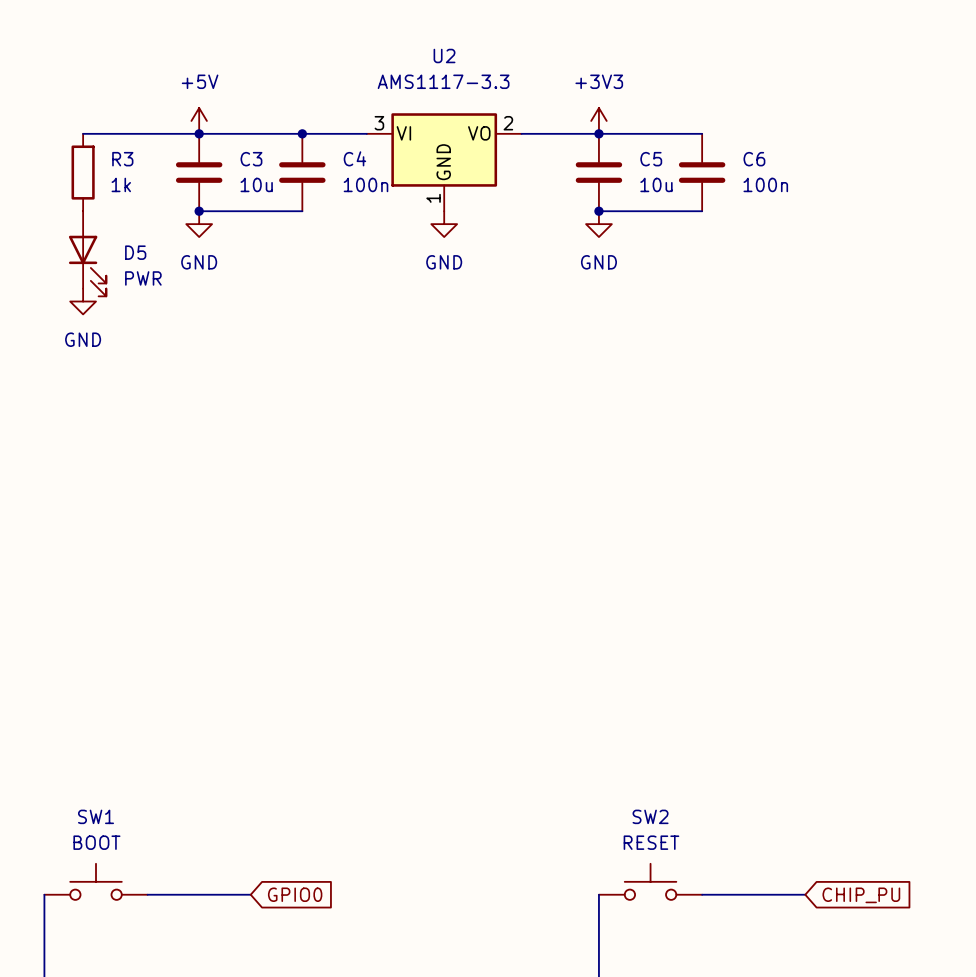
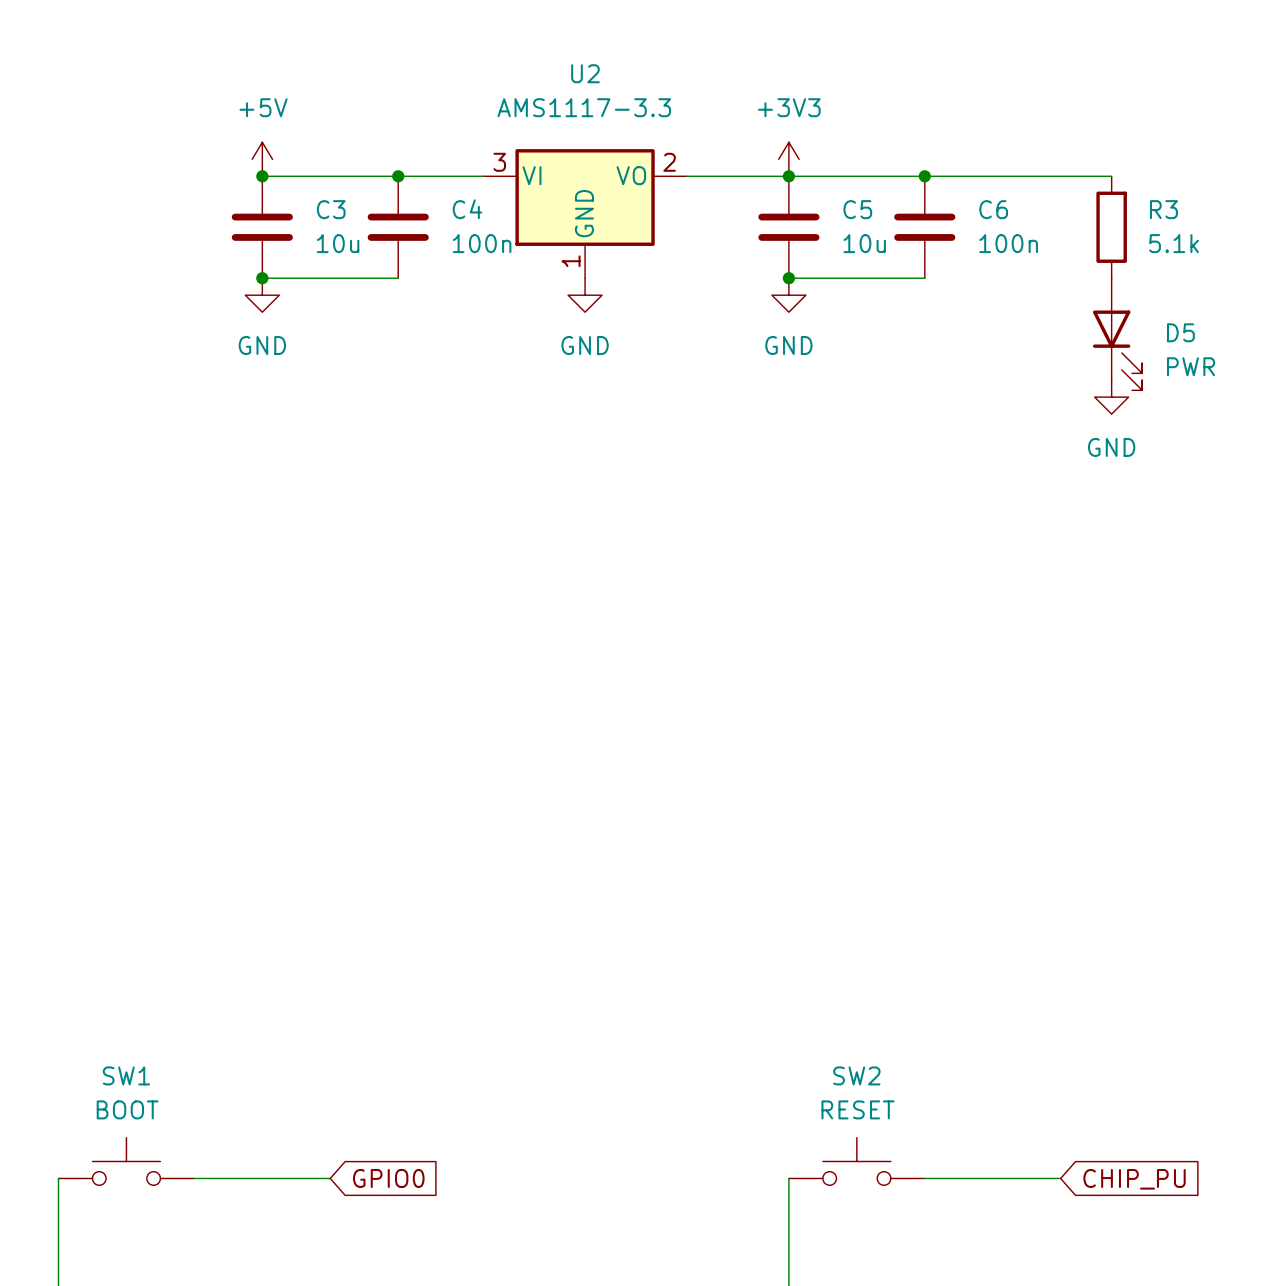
wire: (83, 133) (199, 133) -> none
wire: none -> (924, 176) (1111, 176)
junction: none -> (924, 176)
R3 position: (83, 172) -> (1111, 227)
R3 value: 1k (121, 184) -> 5.1k (1174, 243)
D5 position: (87, 253) -> (1117, 334)
power symbol: GND (83, 301) -> none
power symbol: none -> GND (1111, 397)

